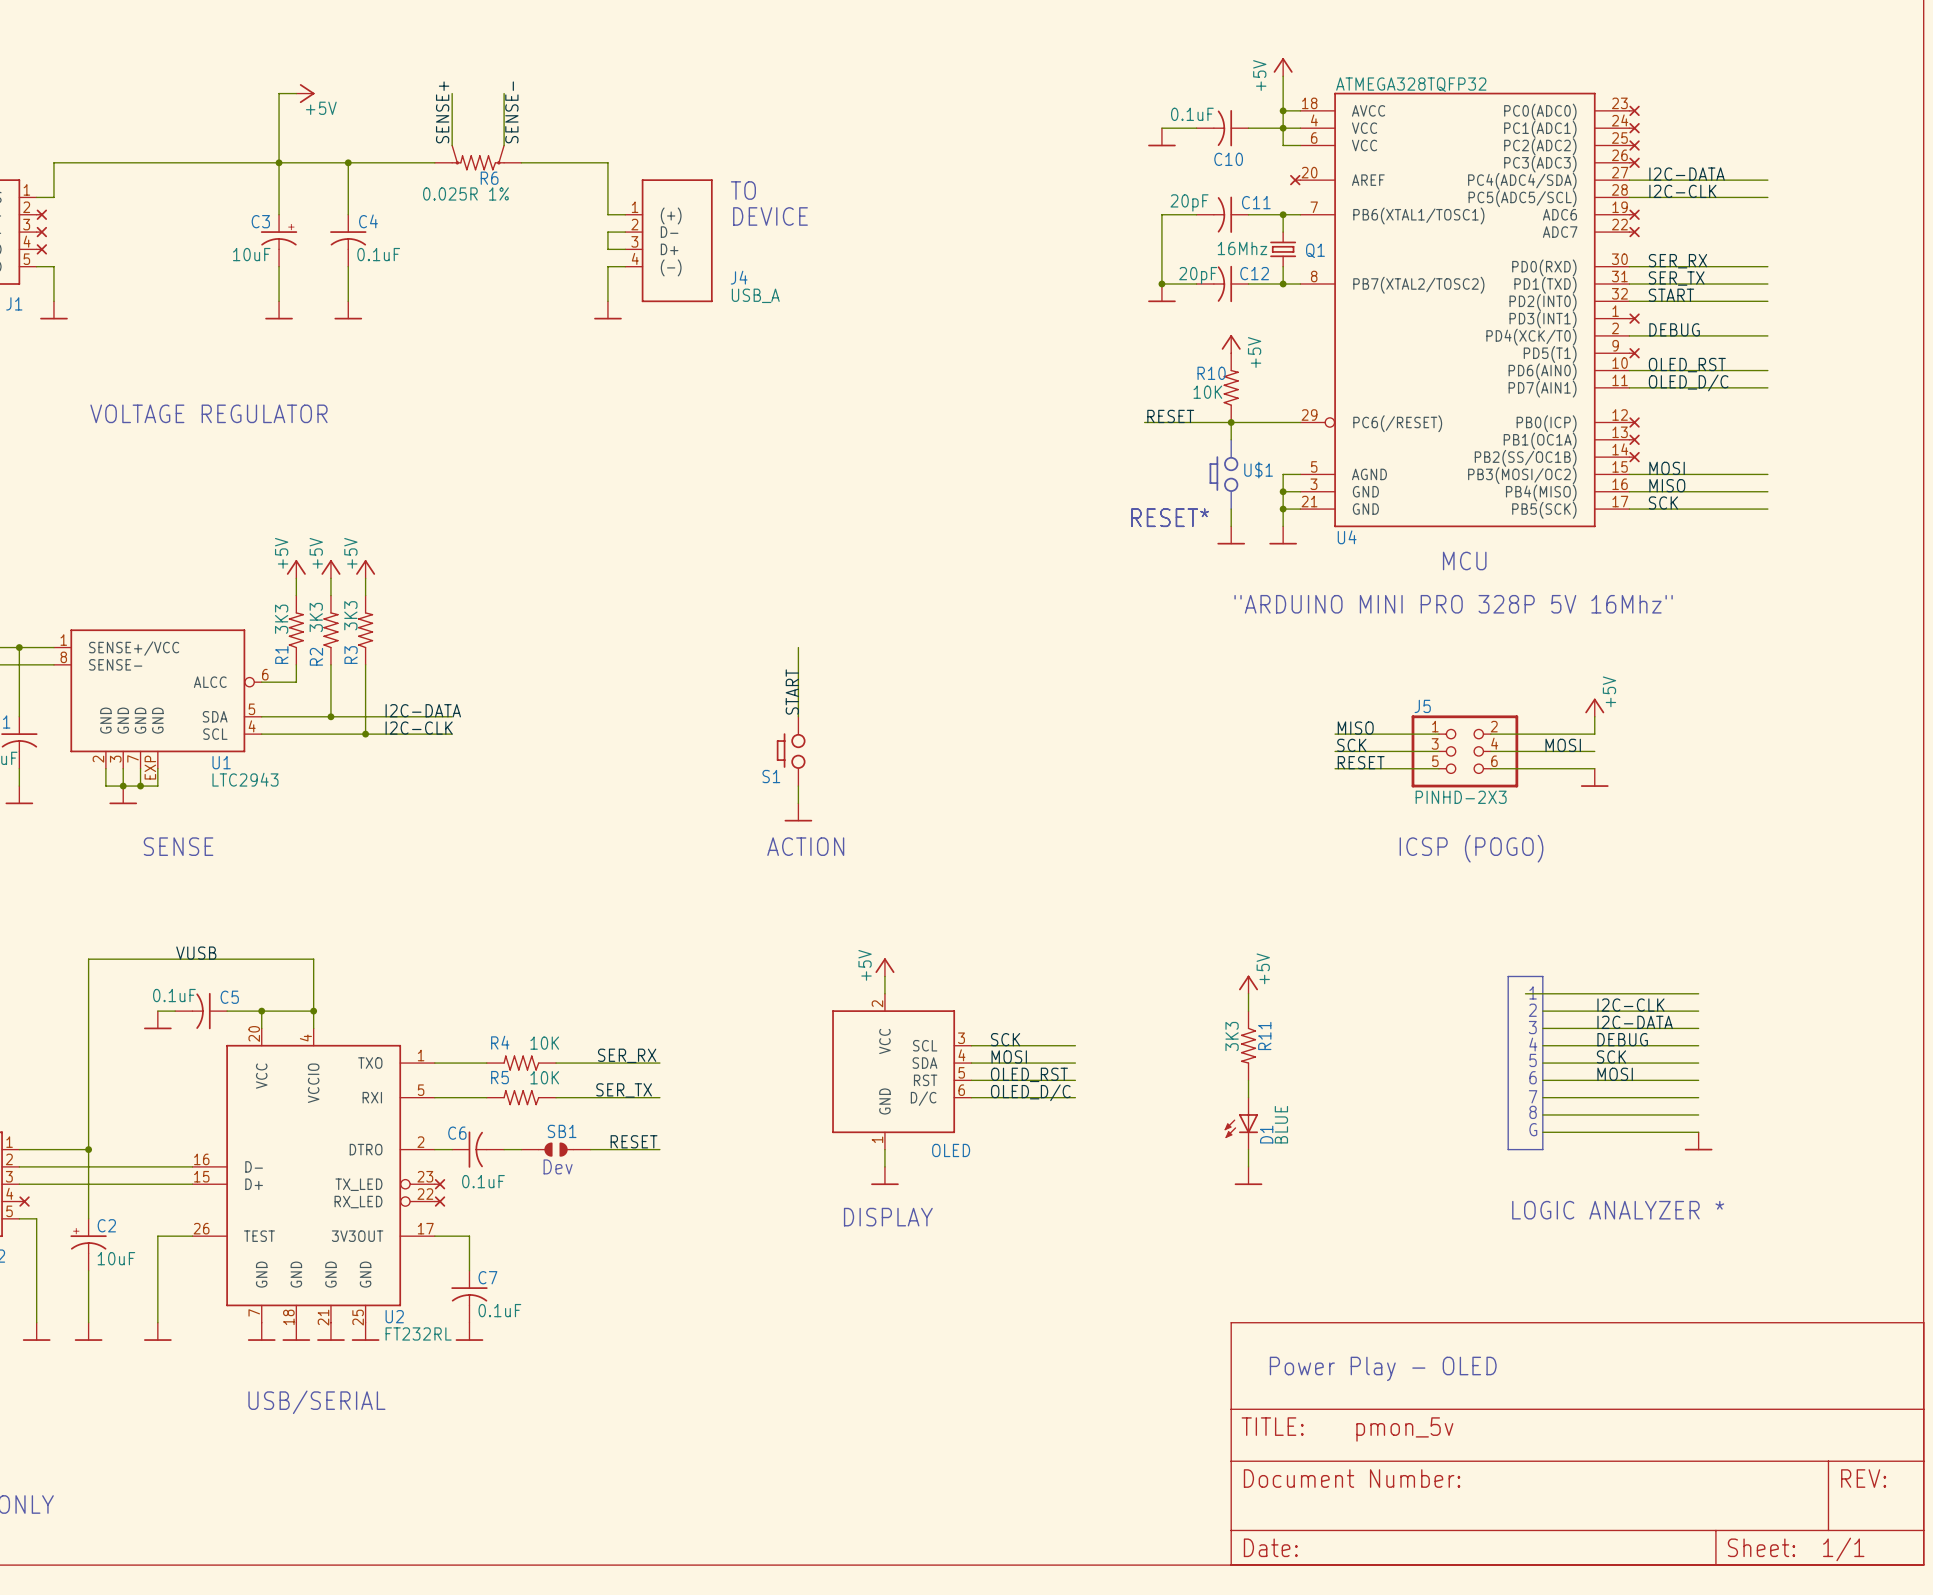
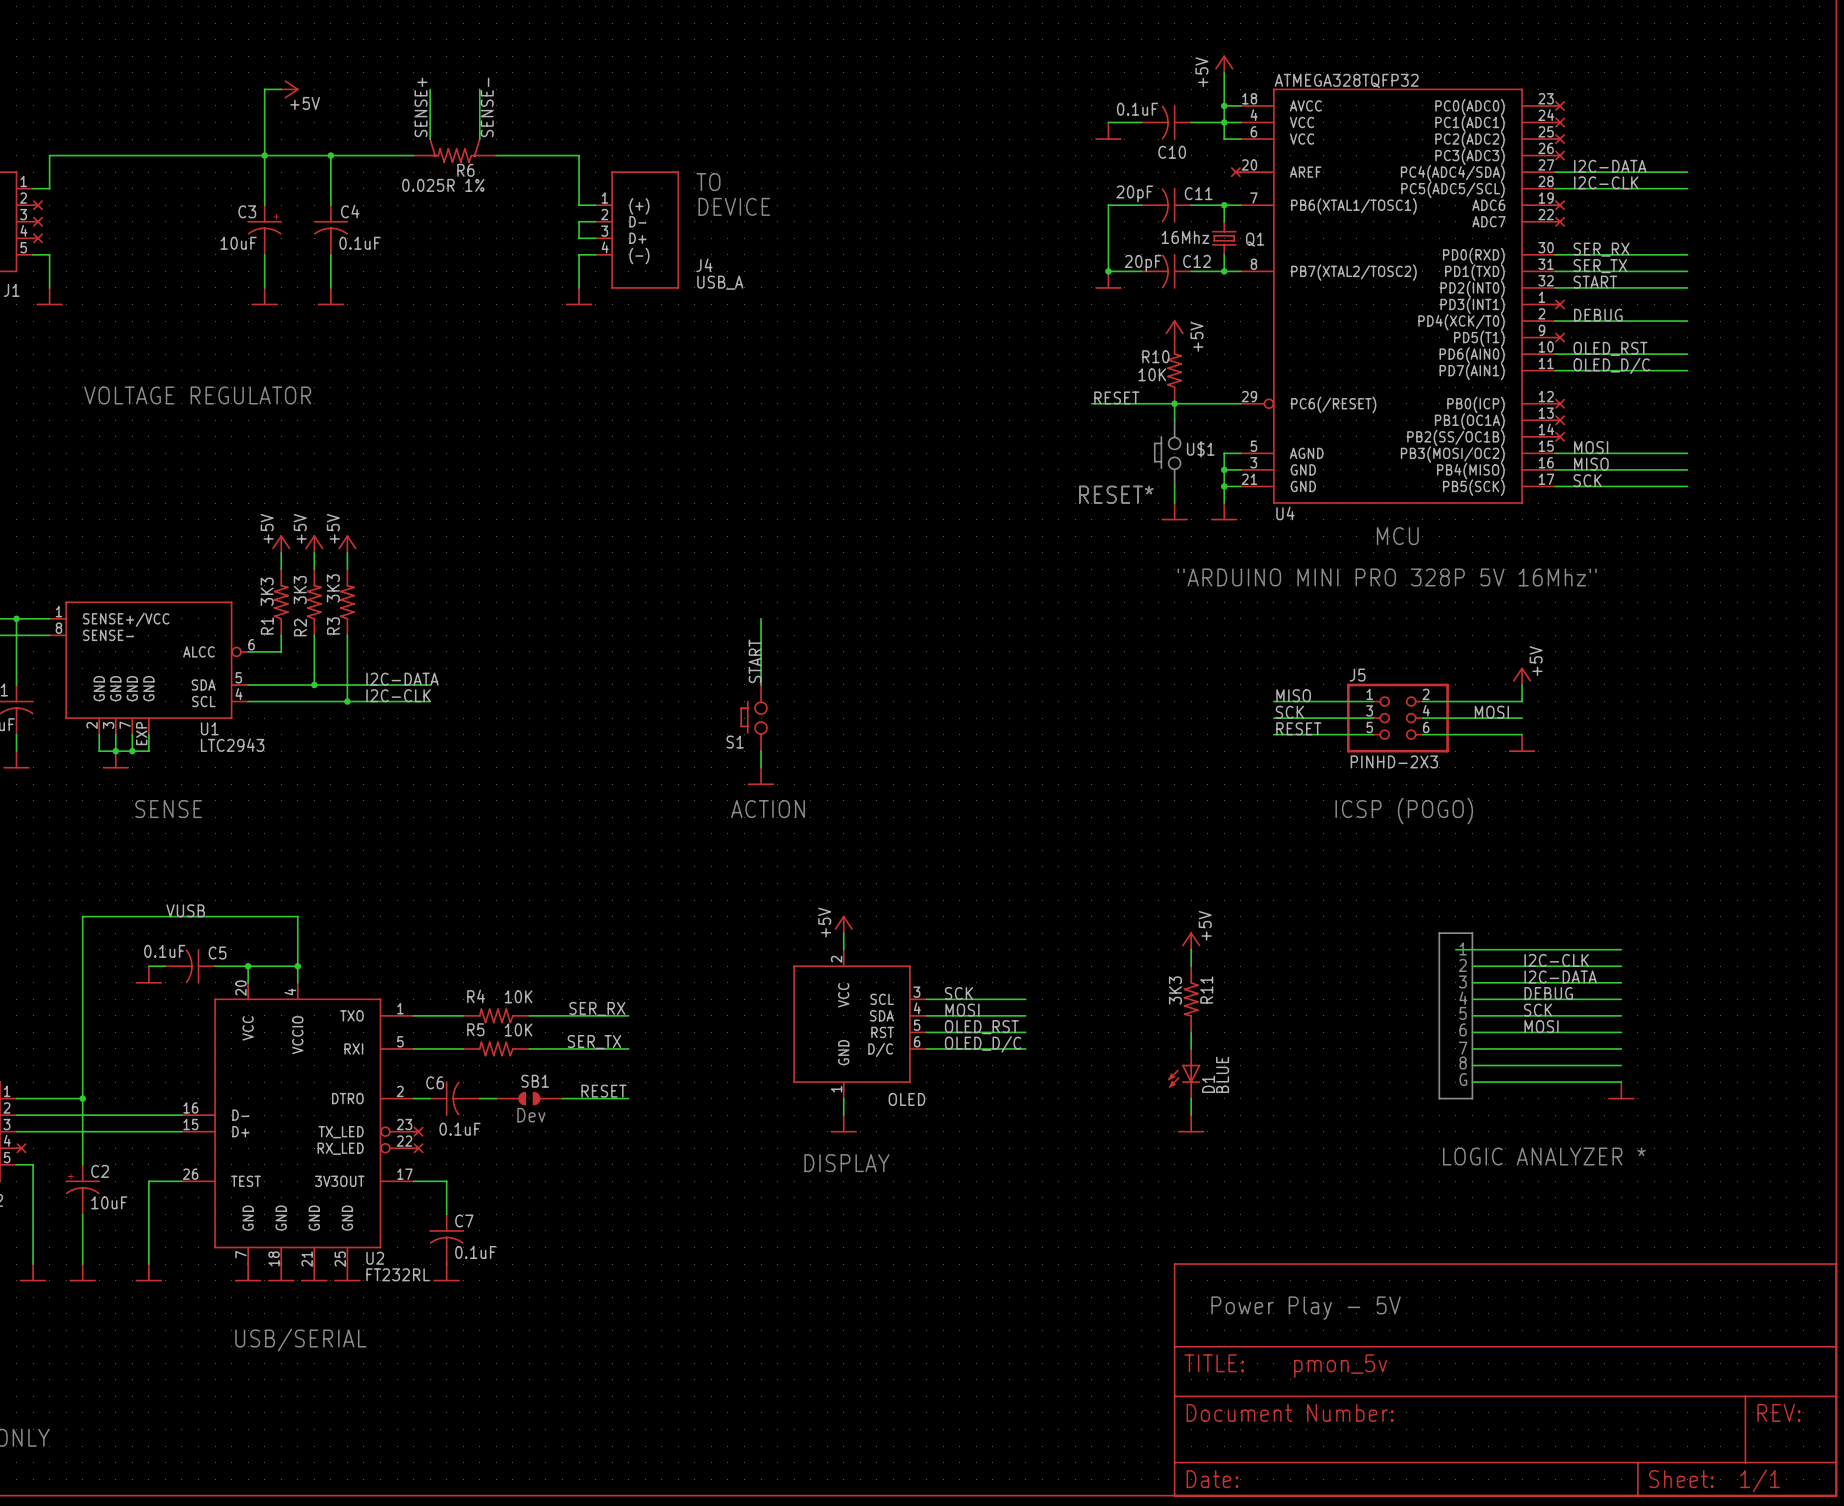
text: Power Play - OLED (1383, 1368) -> Power Play - 5V (1306, 1308)

